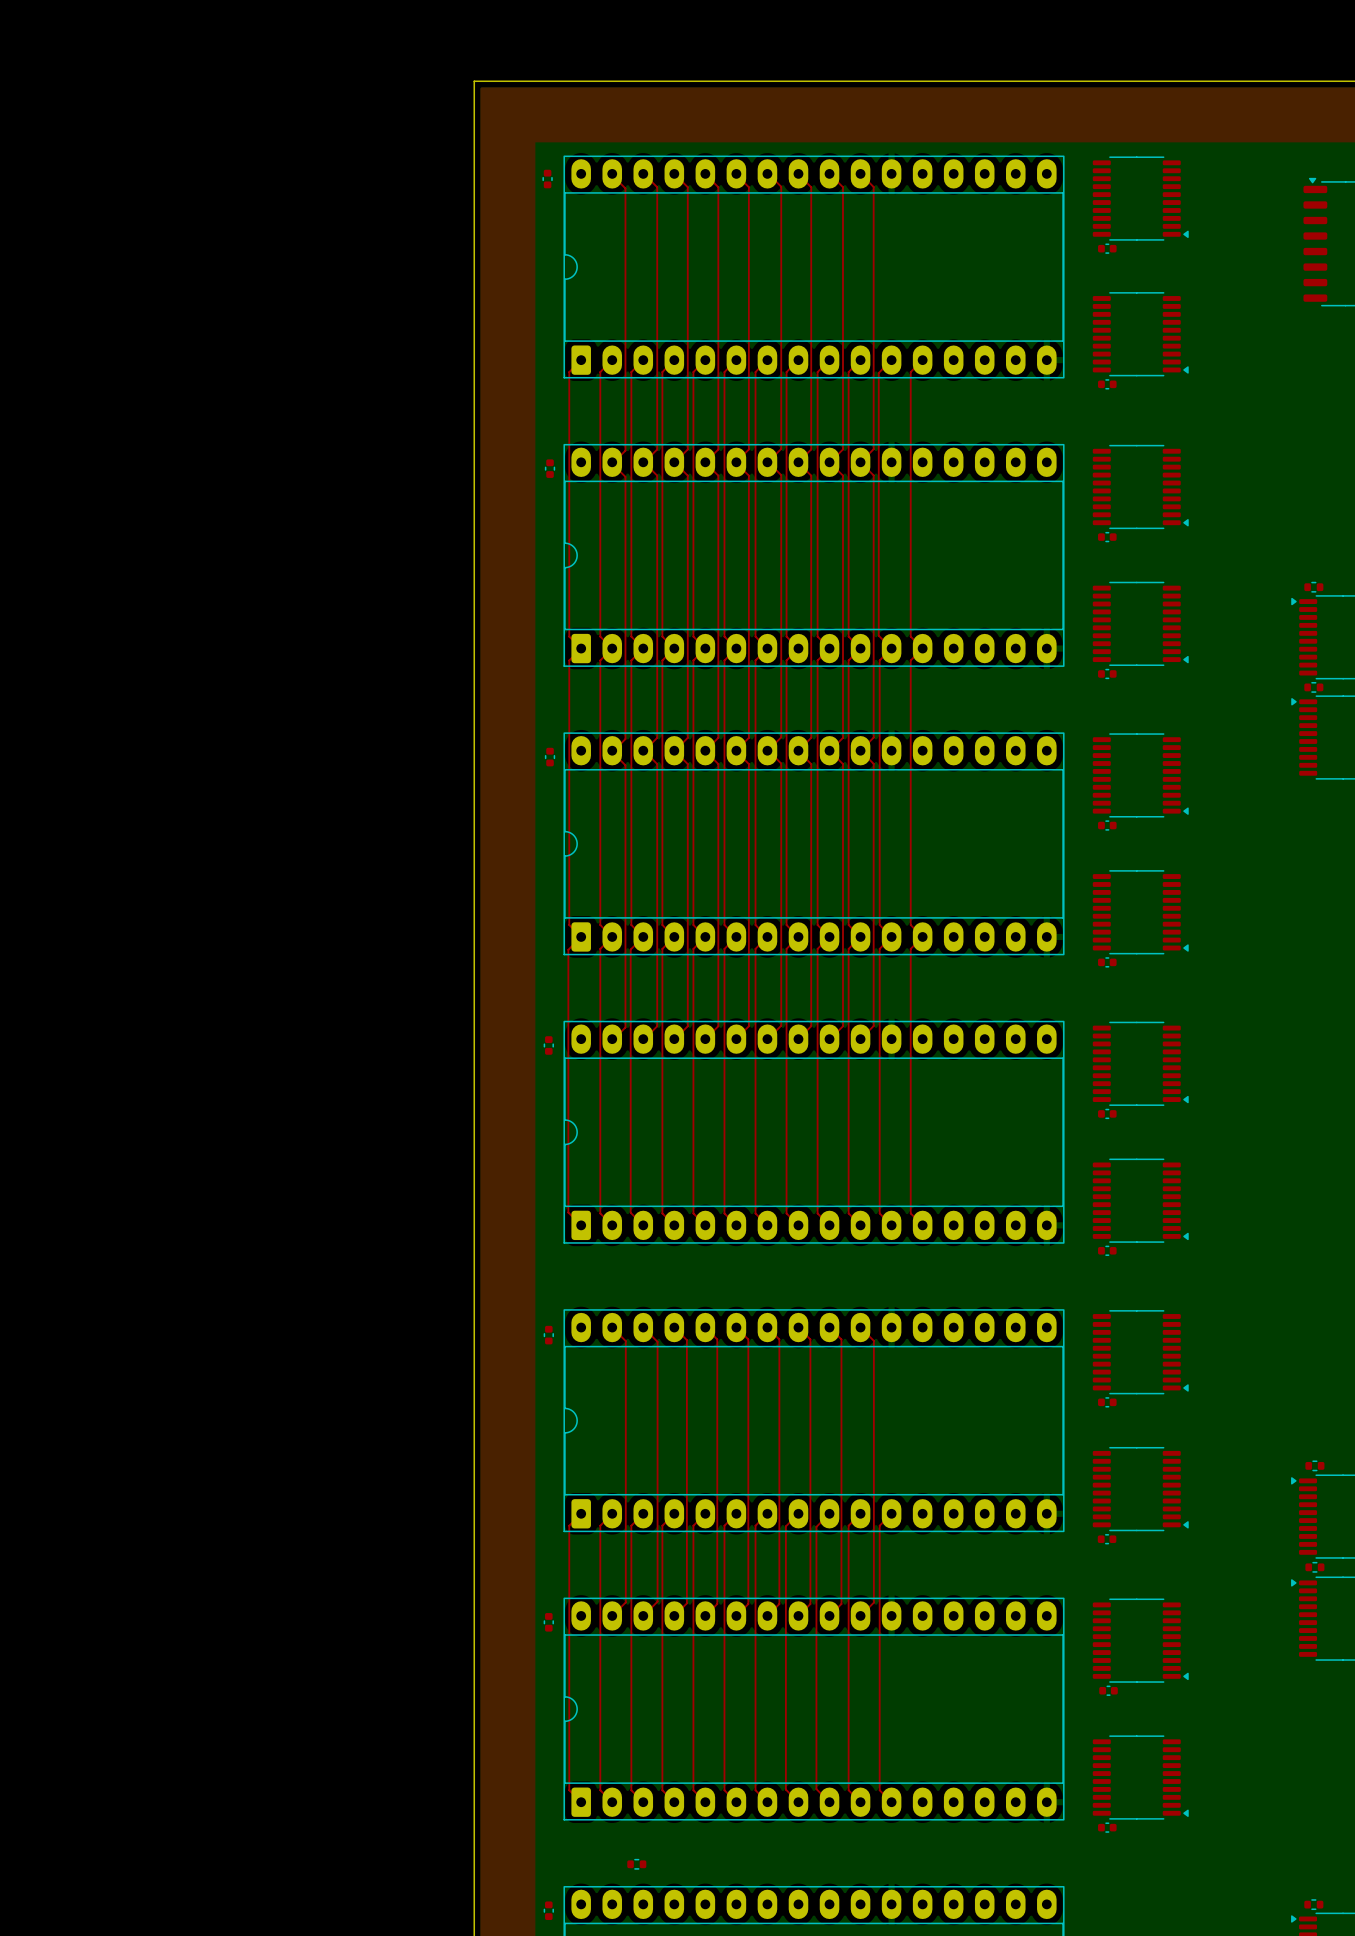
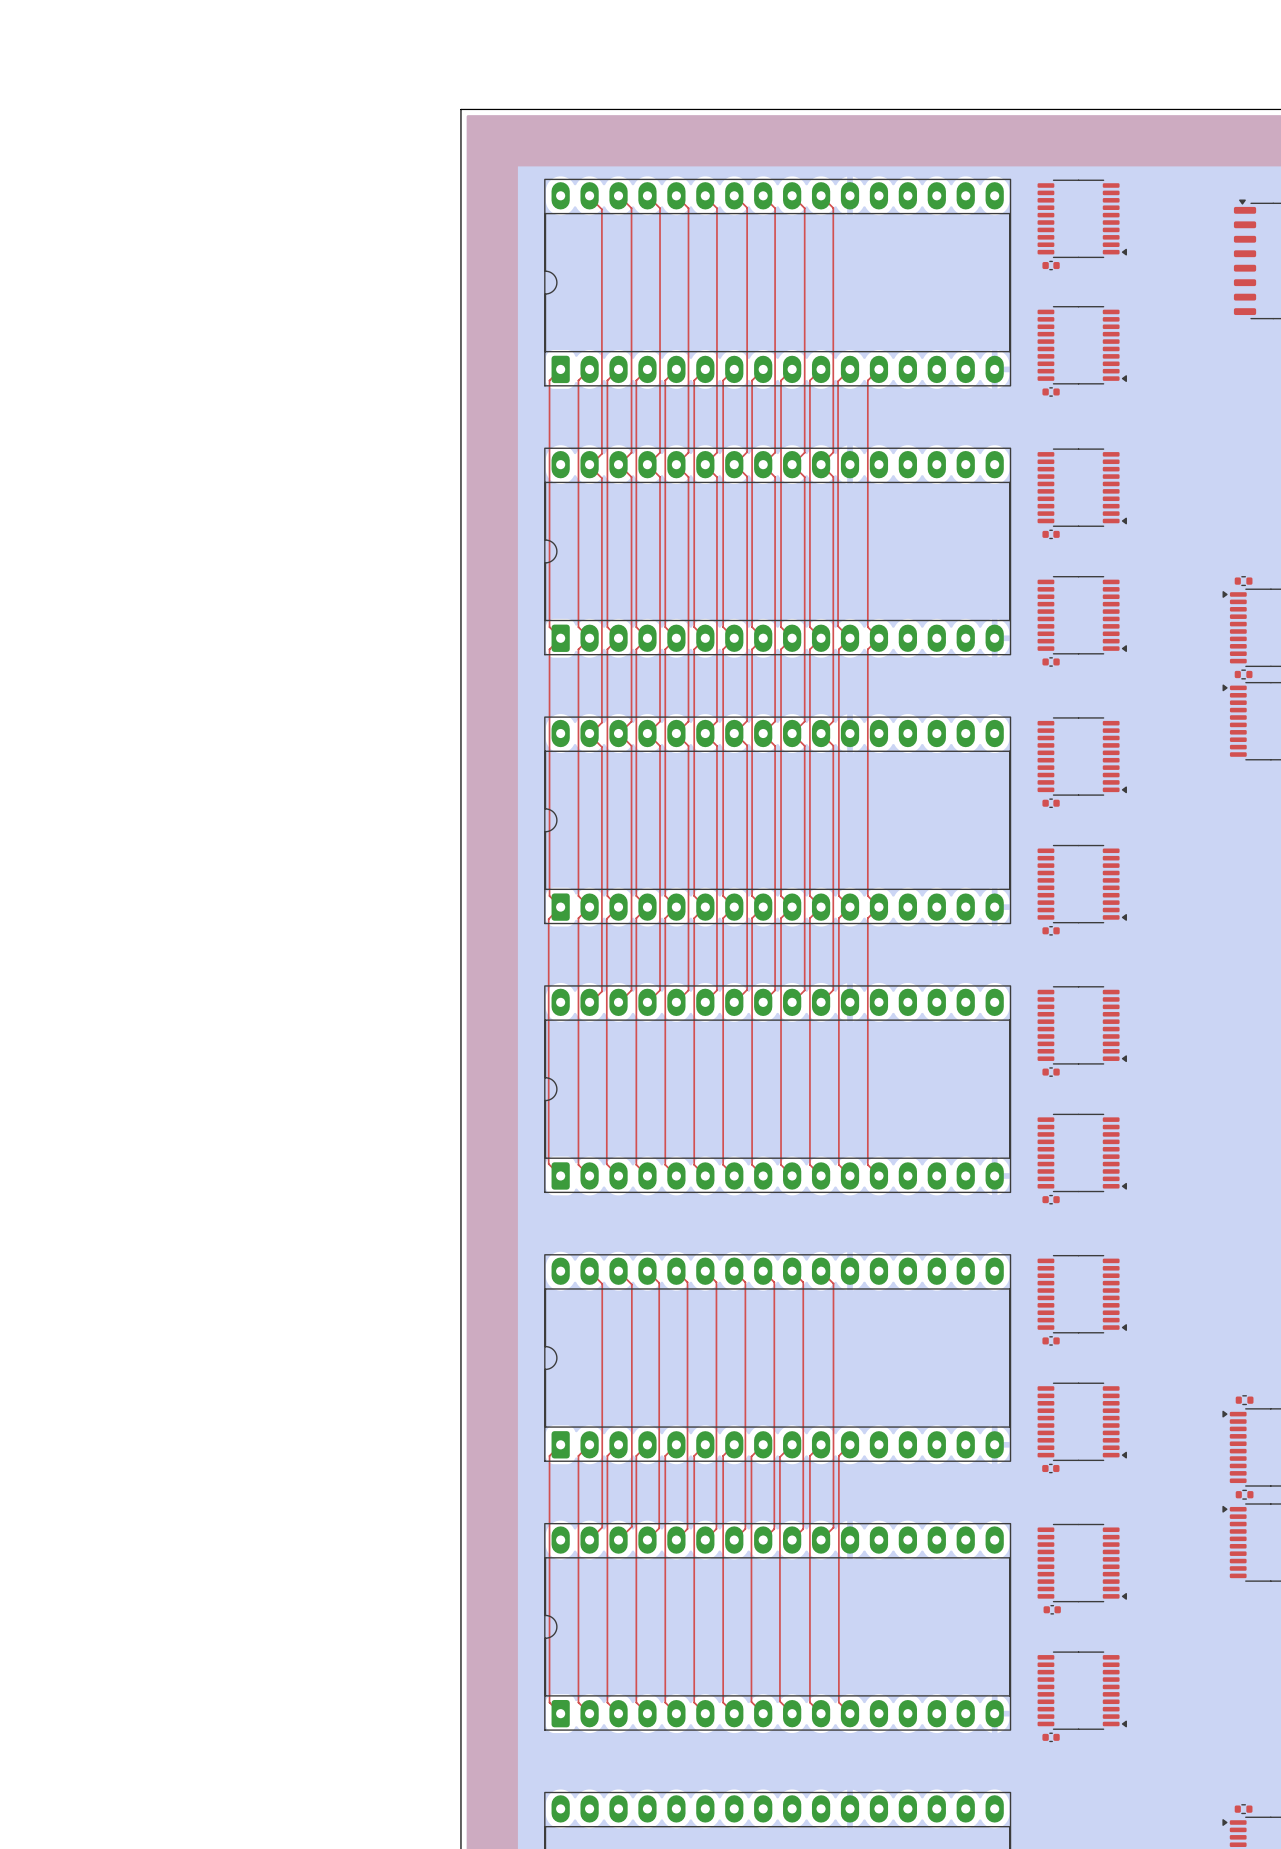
part: (547, 179) -> none
part: (550, 468) -> none
part: (550, 757) -> none
part: (548, 1045) -> none
part: (548, 1335) -> none
part: (548, 1622) -> none
part: (636, 1864) -> none
part: (548, 1910) -> none

